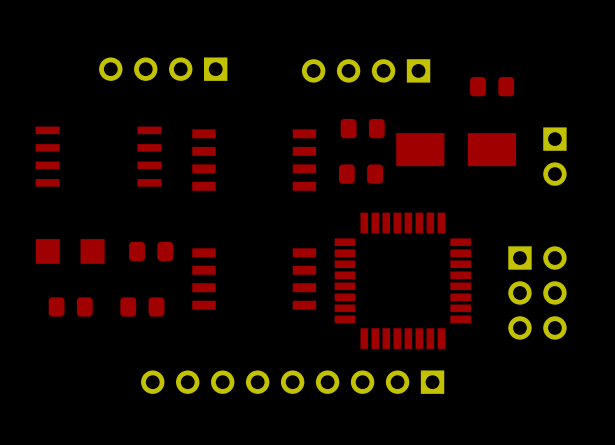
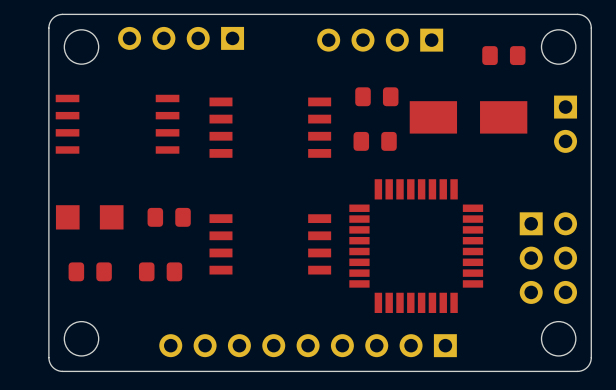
board edge: none -> (577, 14) (62, 14) (55, 16) (50, 21) (48, 28) (48, 357) (50, 364) (55, 369) (62, 371) (577, 371) (584, 369) (589, 364) (591, 357) (591, 28) (587, 18) (577, 14)
round board edge: none -> [64, 29, 100, 65]
round board edge: none -> [541, 29, 577, 65]
round board edge: none -> [64, 321, 100, 357]
round board edge: none -> [541, 321, 577, 357]

